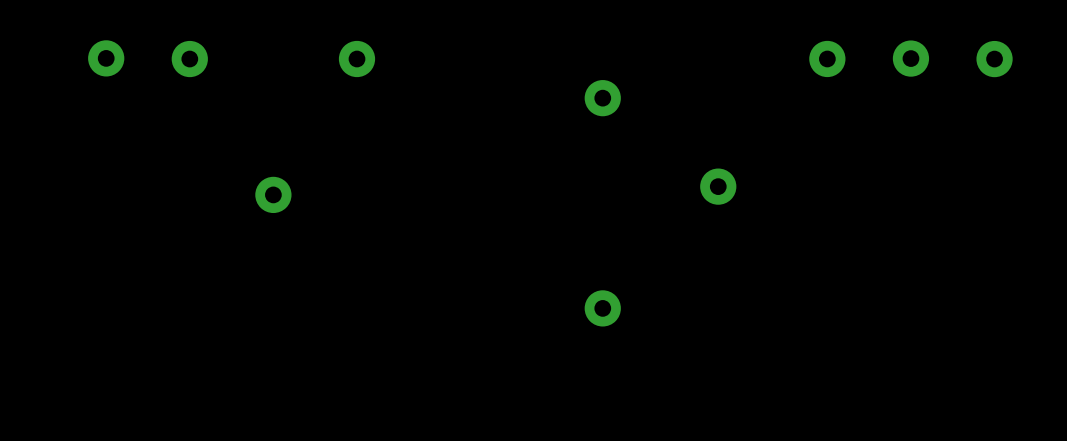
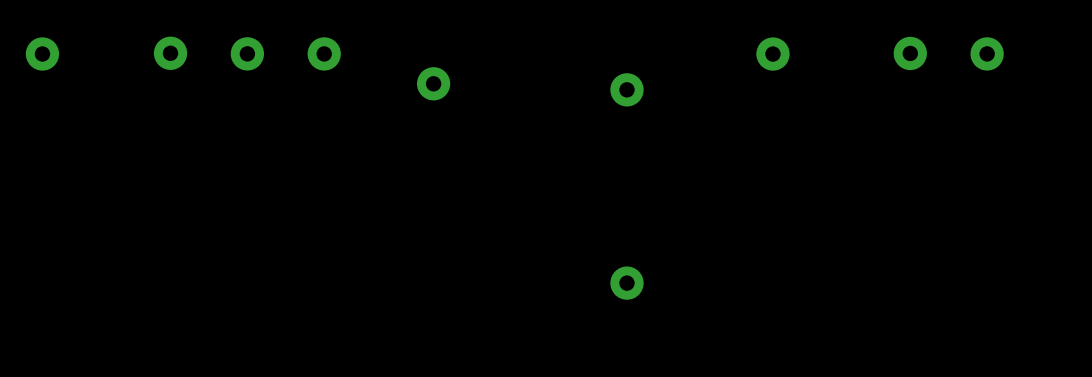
via position: (827, 58) -> (772, 54)
via: none -> (324, 53)
via position: (356, 59) -> (433, 83)
via: (718, 186) -> none
via: (273, 194) -> none

